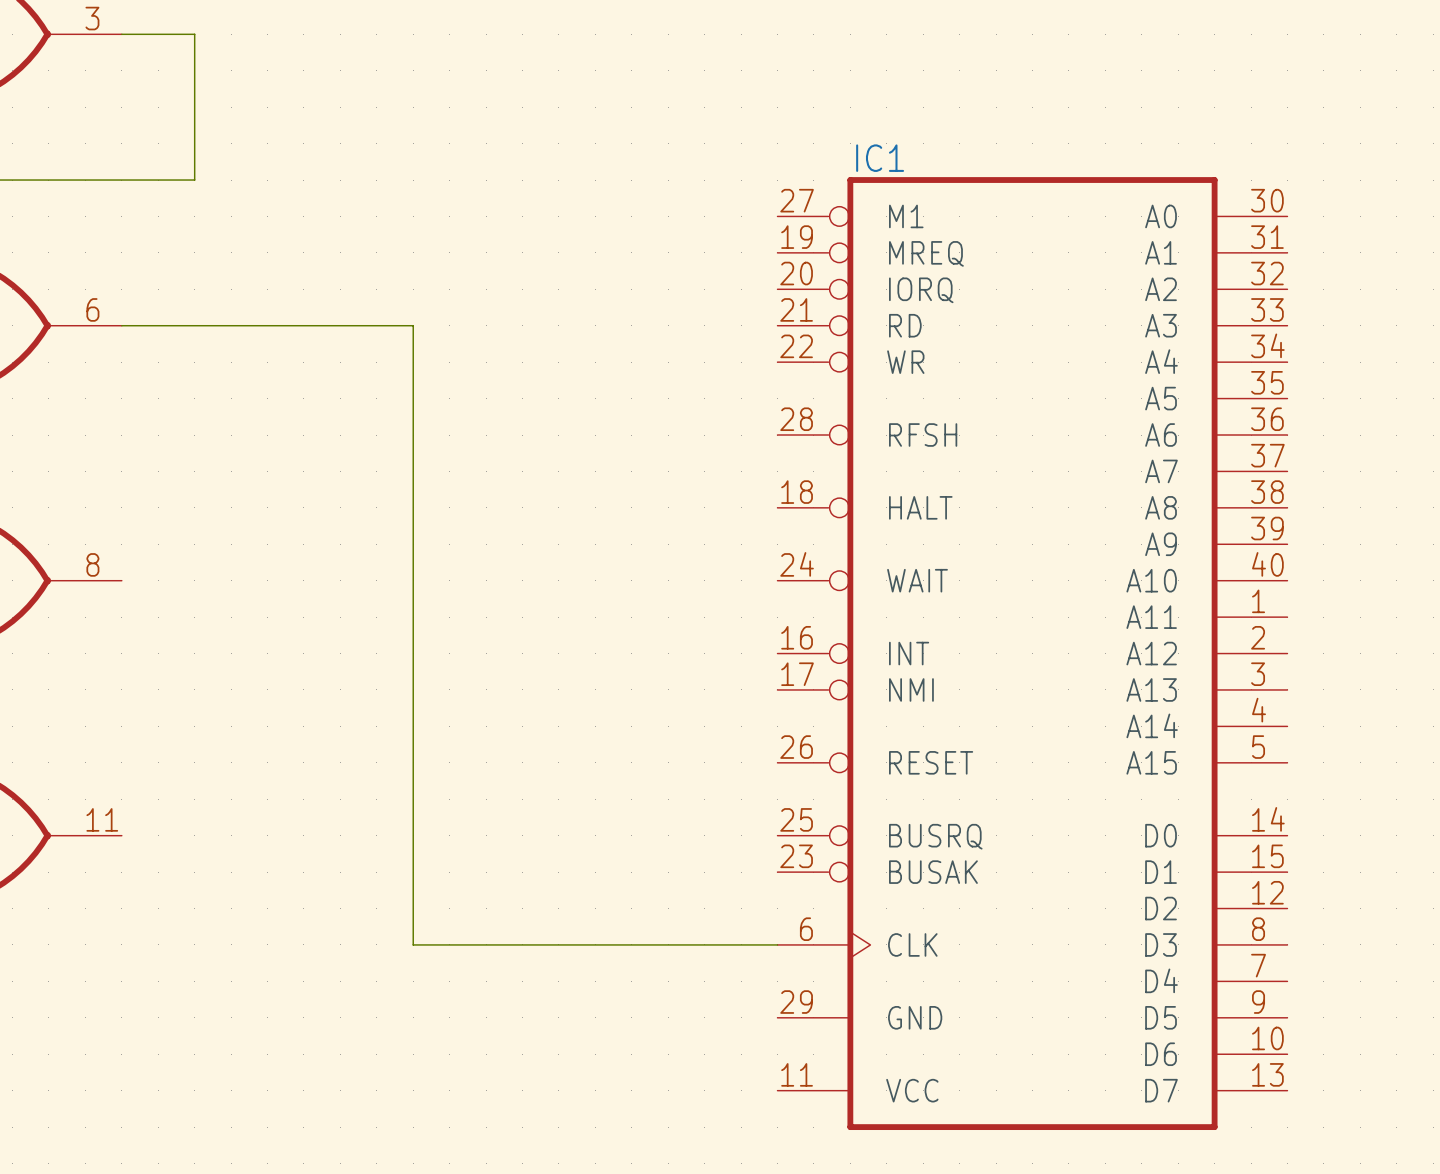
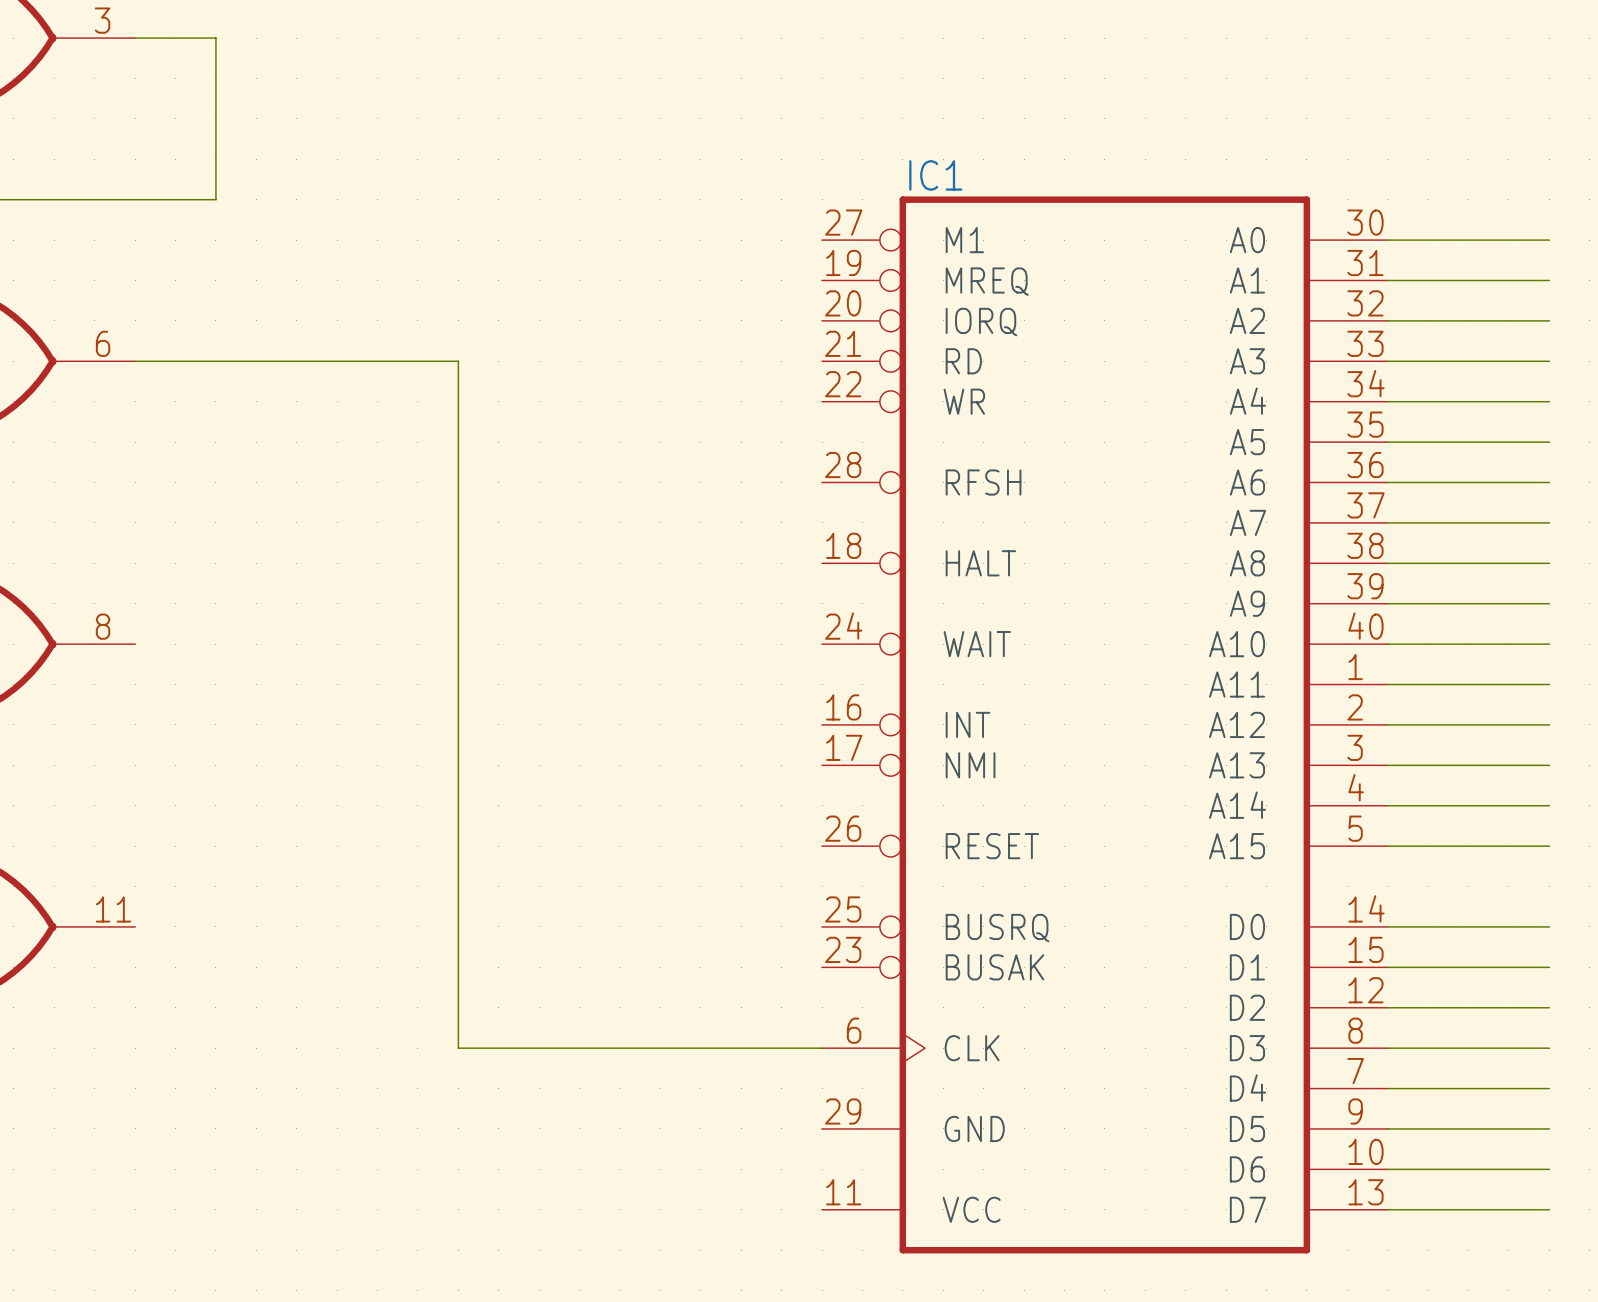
wire: none -> (1387, 240) (1549, 240)
wire: none -> (1387, 280) (1549, 280)
wire: none -> (1387, 320) (1549, 320)
wire: none -> (1387, 361) (1549, 361)
wire: none -> (1387, 401) (1549, 401)
wire: none -> (1387, 442) (1549, 442)
wire: none -> (1387, 482) (1549, 482)
wire: none -> (1387, 522) (1549, 522)
wire: none -> (1387, 563) (1549, 563)
wire: none -> (1387, 603) (1549, 603)
wire: none -> (1387, 644) (1549, 644)
wire: none -> (1387, 684) (1549, 684)
IC1 position: (1032, 653) -> (1104, 724)
wire: none -> (1387, 724) (1549, 724)
wire: none -> (1387, 765) (1549, 765)
wire: none -> (1387, 805) (1549, 805)
wire: none -> (1387, 846) (1549, 846)
wire: none -> (1387, 926) (1549, 926)
wire: none -> (1387, 967) (1549, 967)
wire: none -> (1387, 1007) (1549, 1007)
wire: none -> (1387, 1048) (1549, 1048)
wire: none -> (1387, 1088) (1549, 1088)
wire: none -> (1387, 1128) (1549, 1128)
wire: none -> (1387, 1169) (1549, 1169)
wire: none -> (1387, 1209) (1549, 1209)

